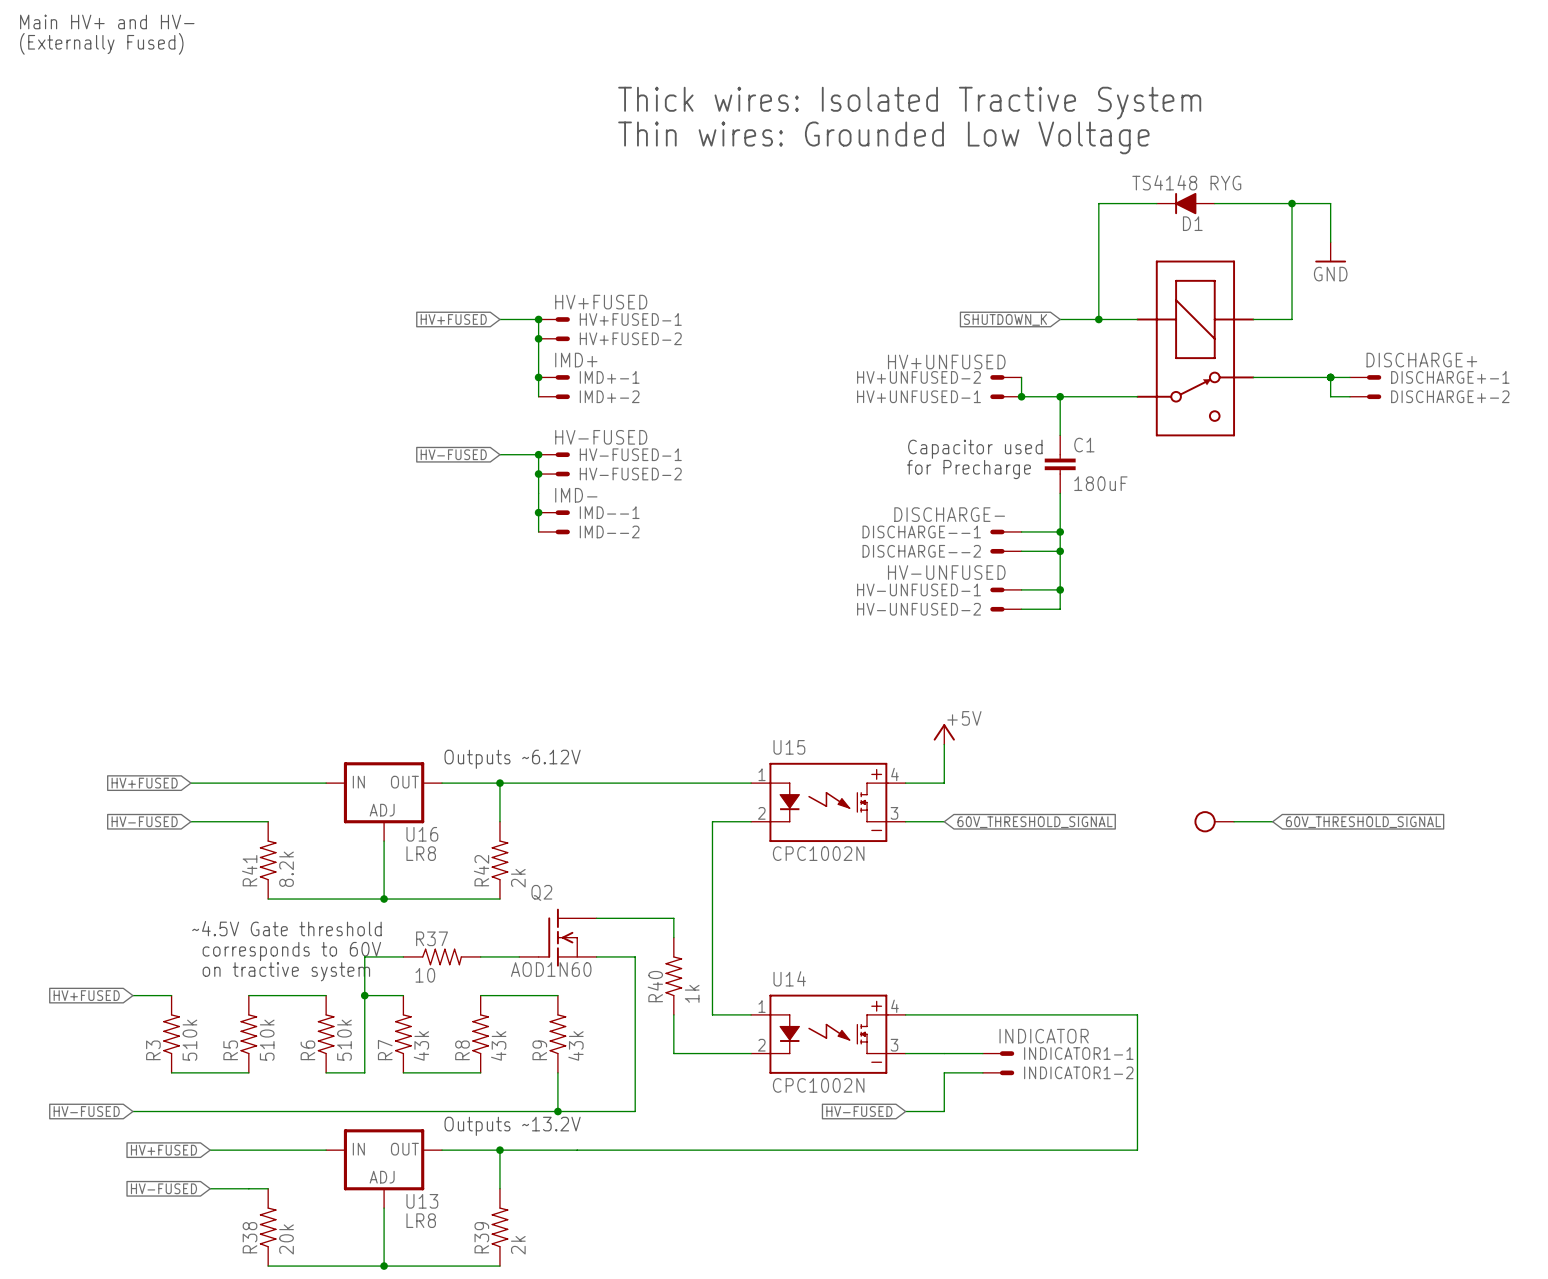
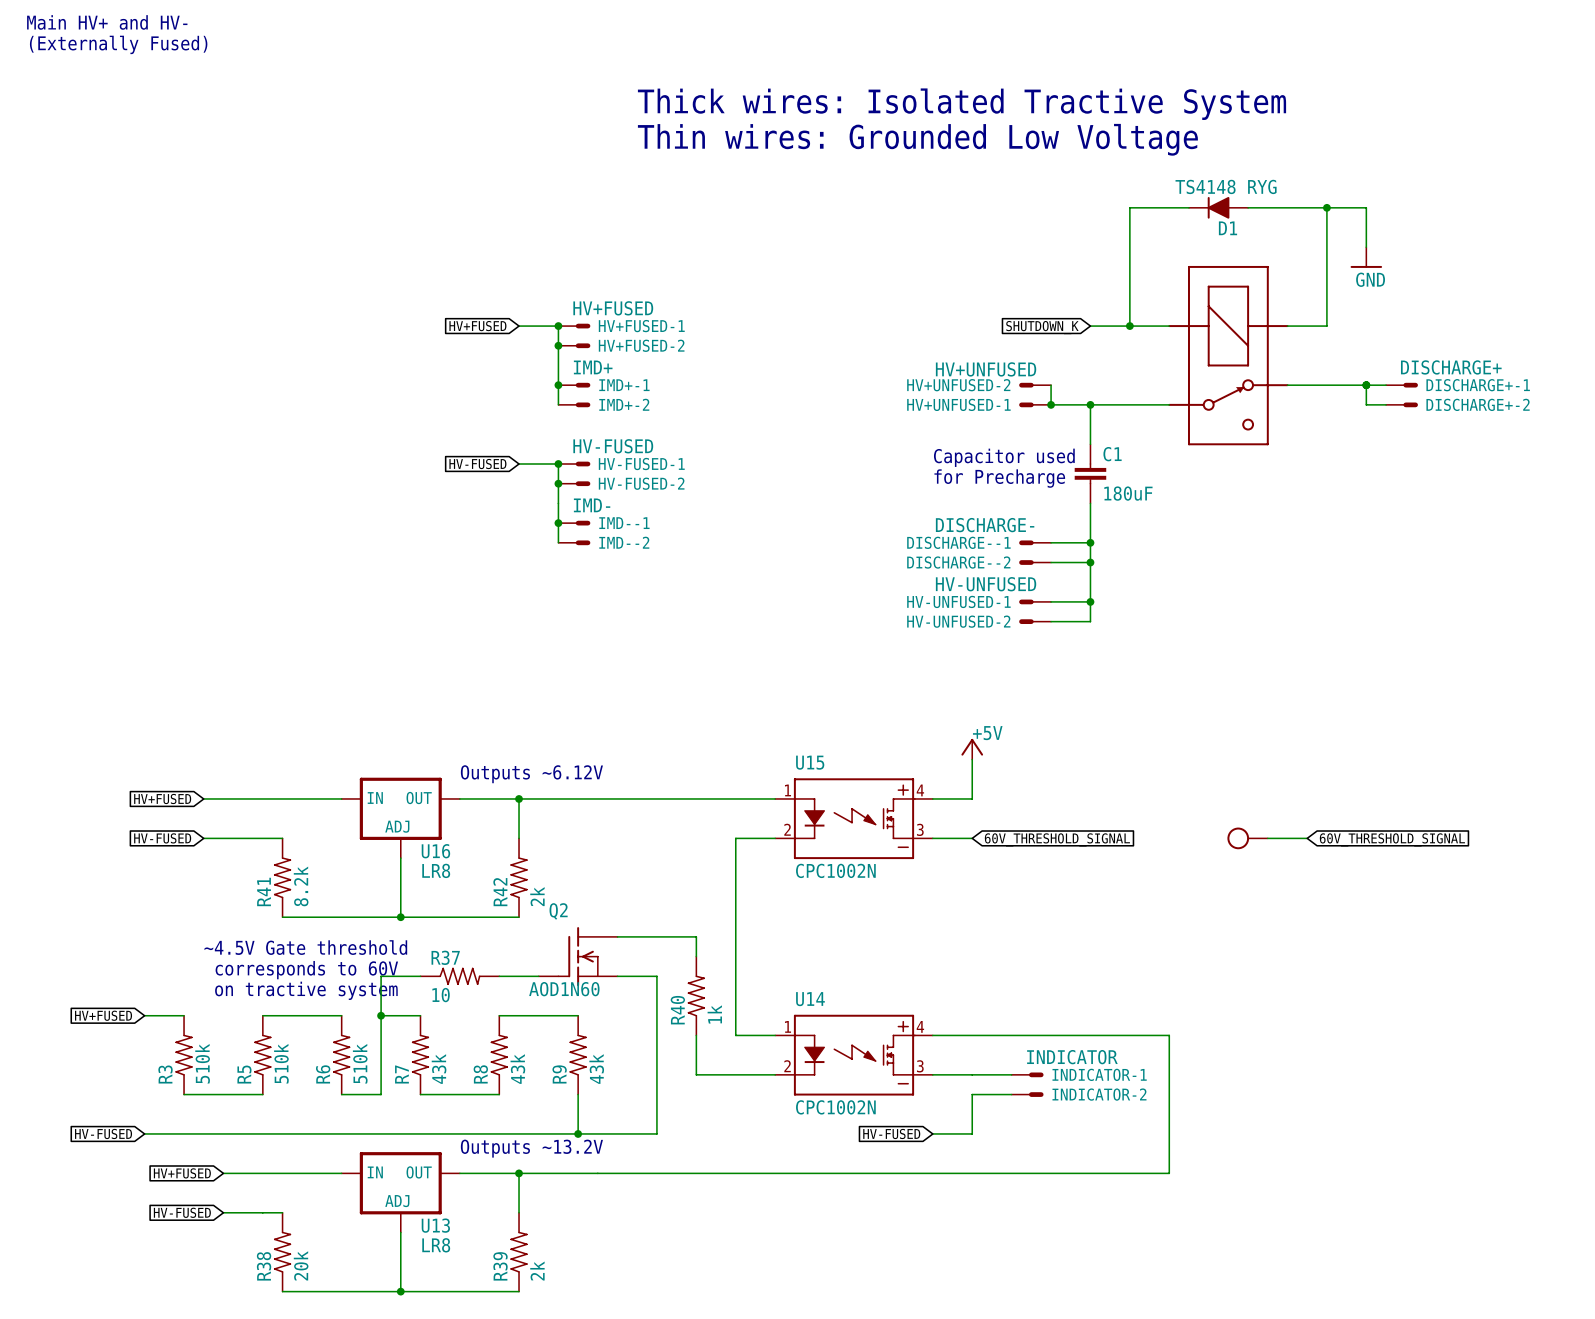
INDICATOR1-1 name: INDICATOR1-1 (1078, 1053) -> INDICATOR-1 (1099, 1074)
INDICATOR1-2 name: INDICATOR1-2 (1078, 1072) -> INDICATOR-2 (1099, 1094)

